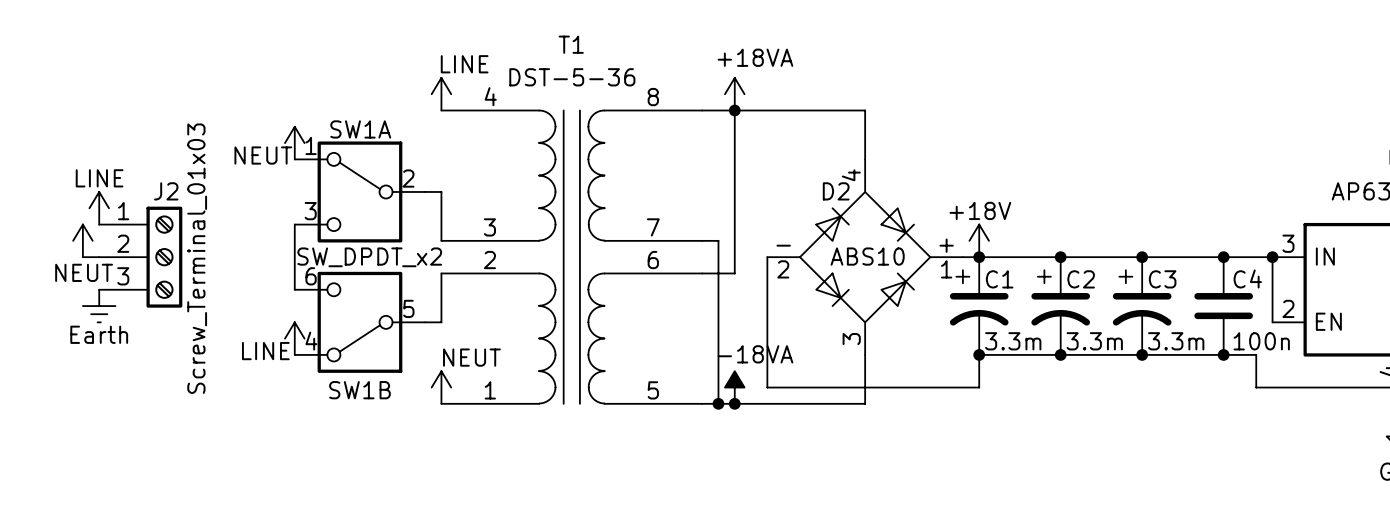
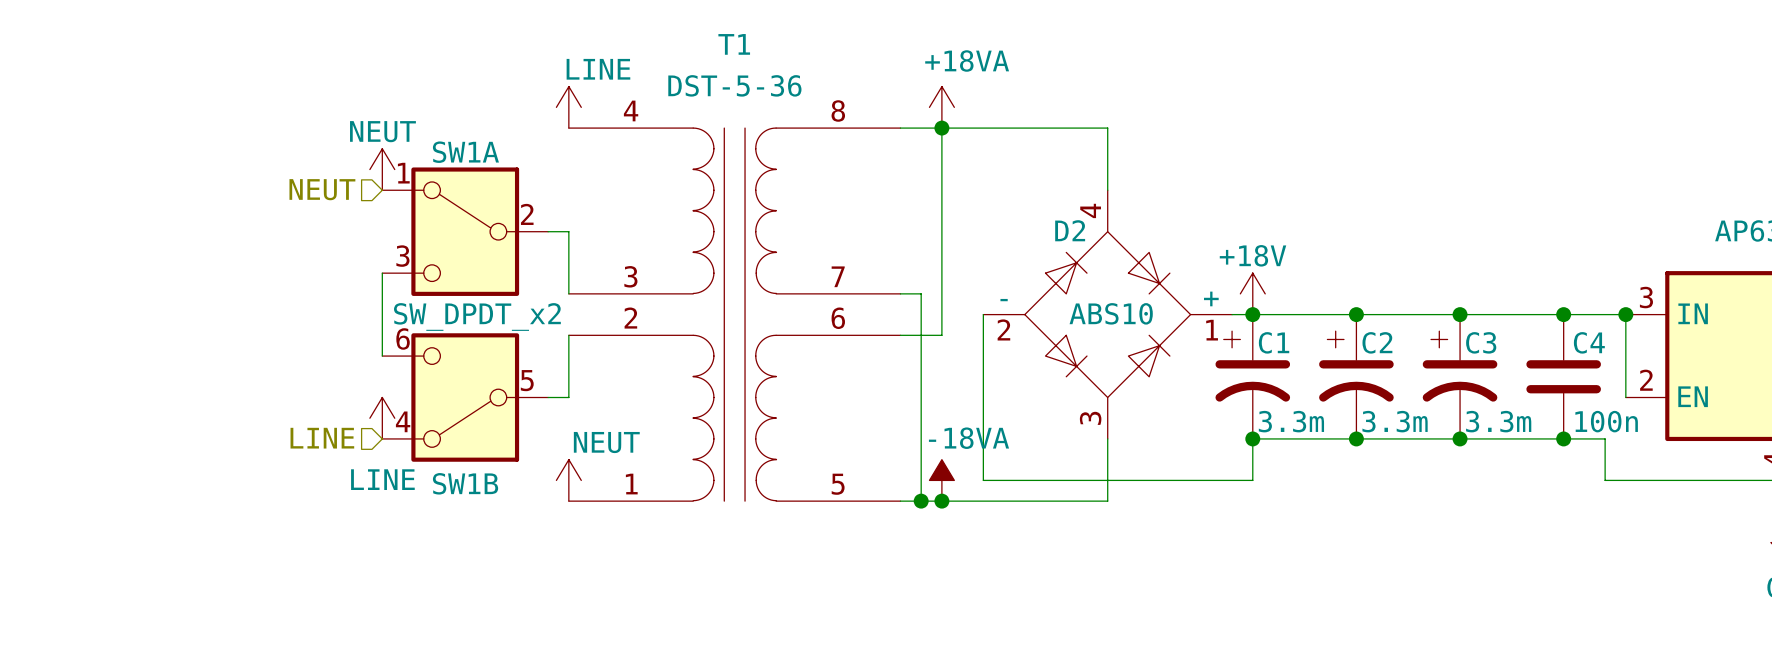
power symbol text position: NEUT (263, 155) -> NEUT (382, 131)
hierarchical label: none -> NEUT (322, 189)
power symbol: LINE (99, 208) -> none
power symbol: NEUT (82, 240) -> none
wire: (82, 257) (99, 257) -> none
J2: Screw_Terminal_01x03 (140, 257) -> none
power symbol: Earth (99, 306) -> none
power symbol text position: LINE (265, 351) -> LINE (382, 479)
hierarchical label: none -> LINE (322, 438)

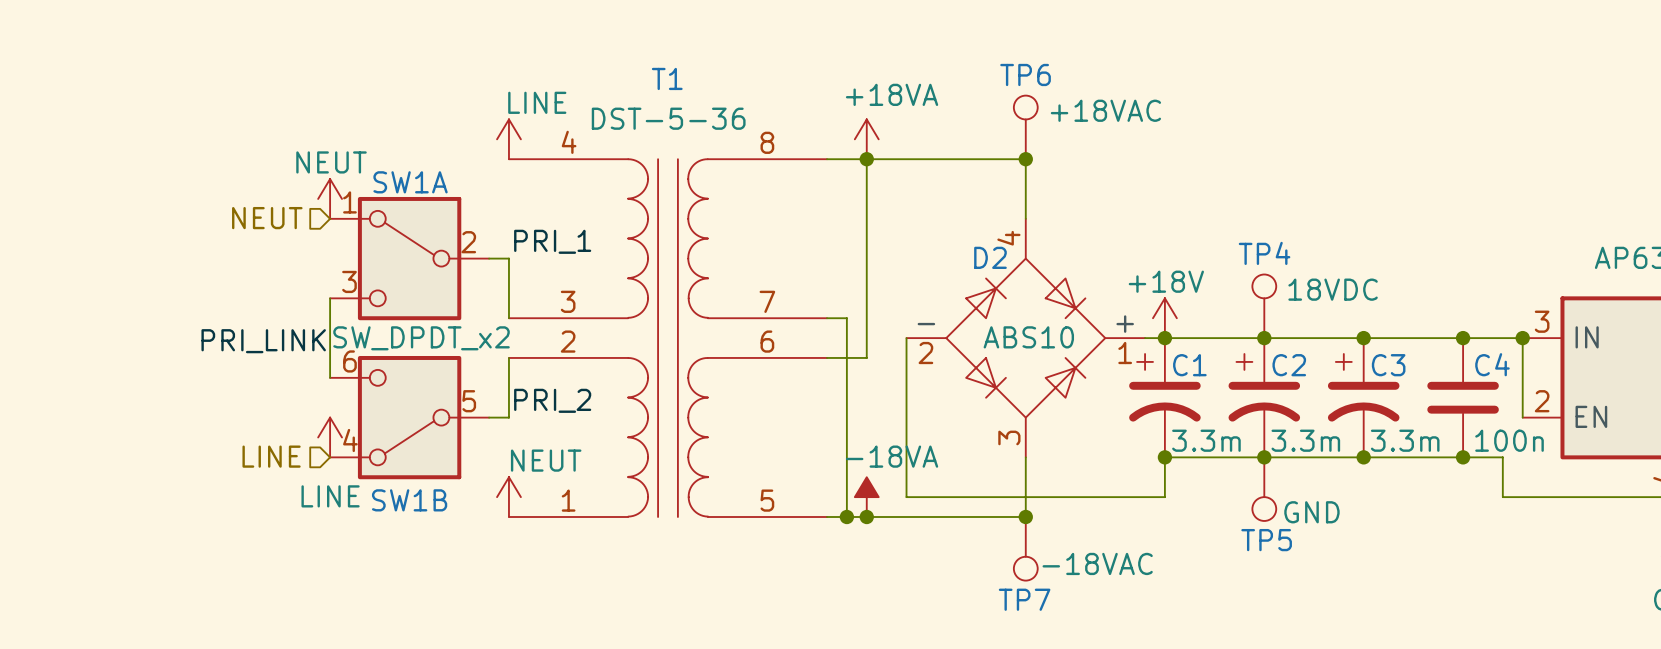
TP6: none -> +18VAC (1025, 127)
junction: none -> (1025, 159)
label: none -> PRI_1 (552, 241)
TP4: none -> 18VDC (1264, 306)
label: none -> PRI_LINK (263, 341)
label: none -> PRI_2 (552, 400)
TP5: none -> GND (1264, 489)
junction: none -> (1025, 516)
TP7: none -> -18VAC (1025, 548)

